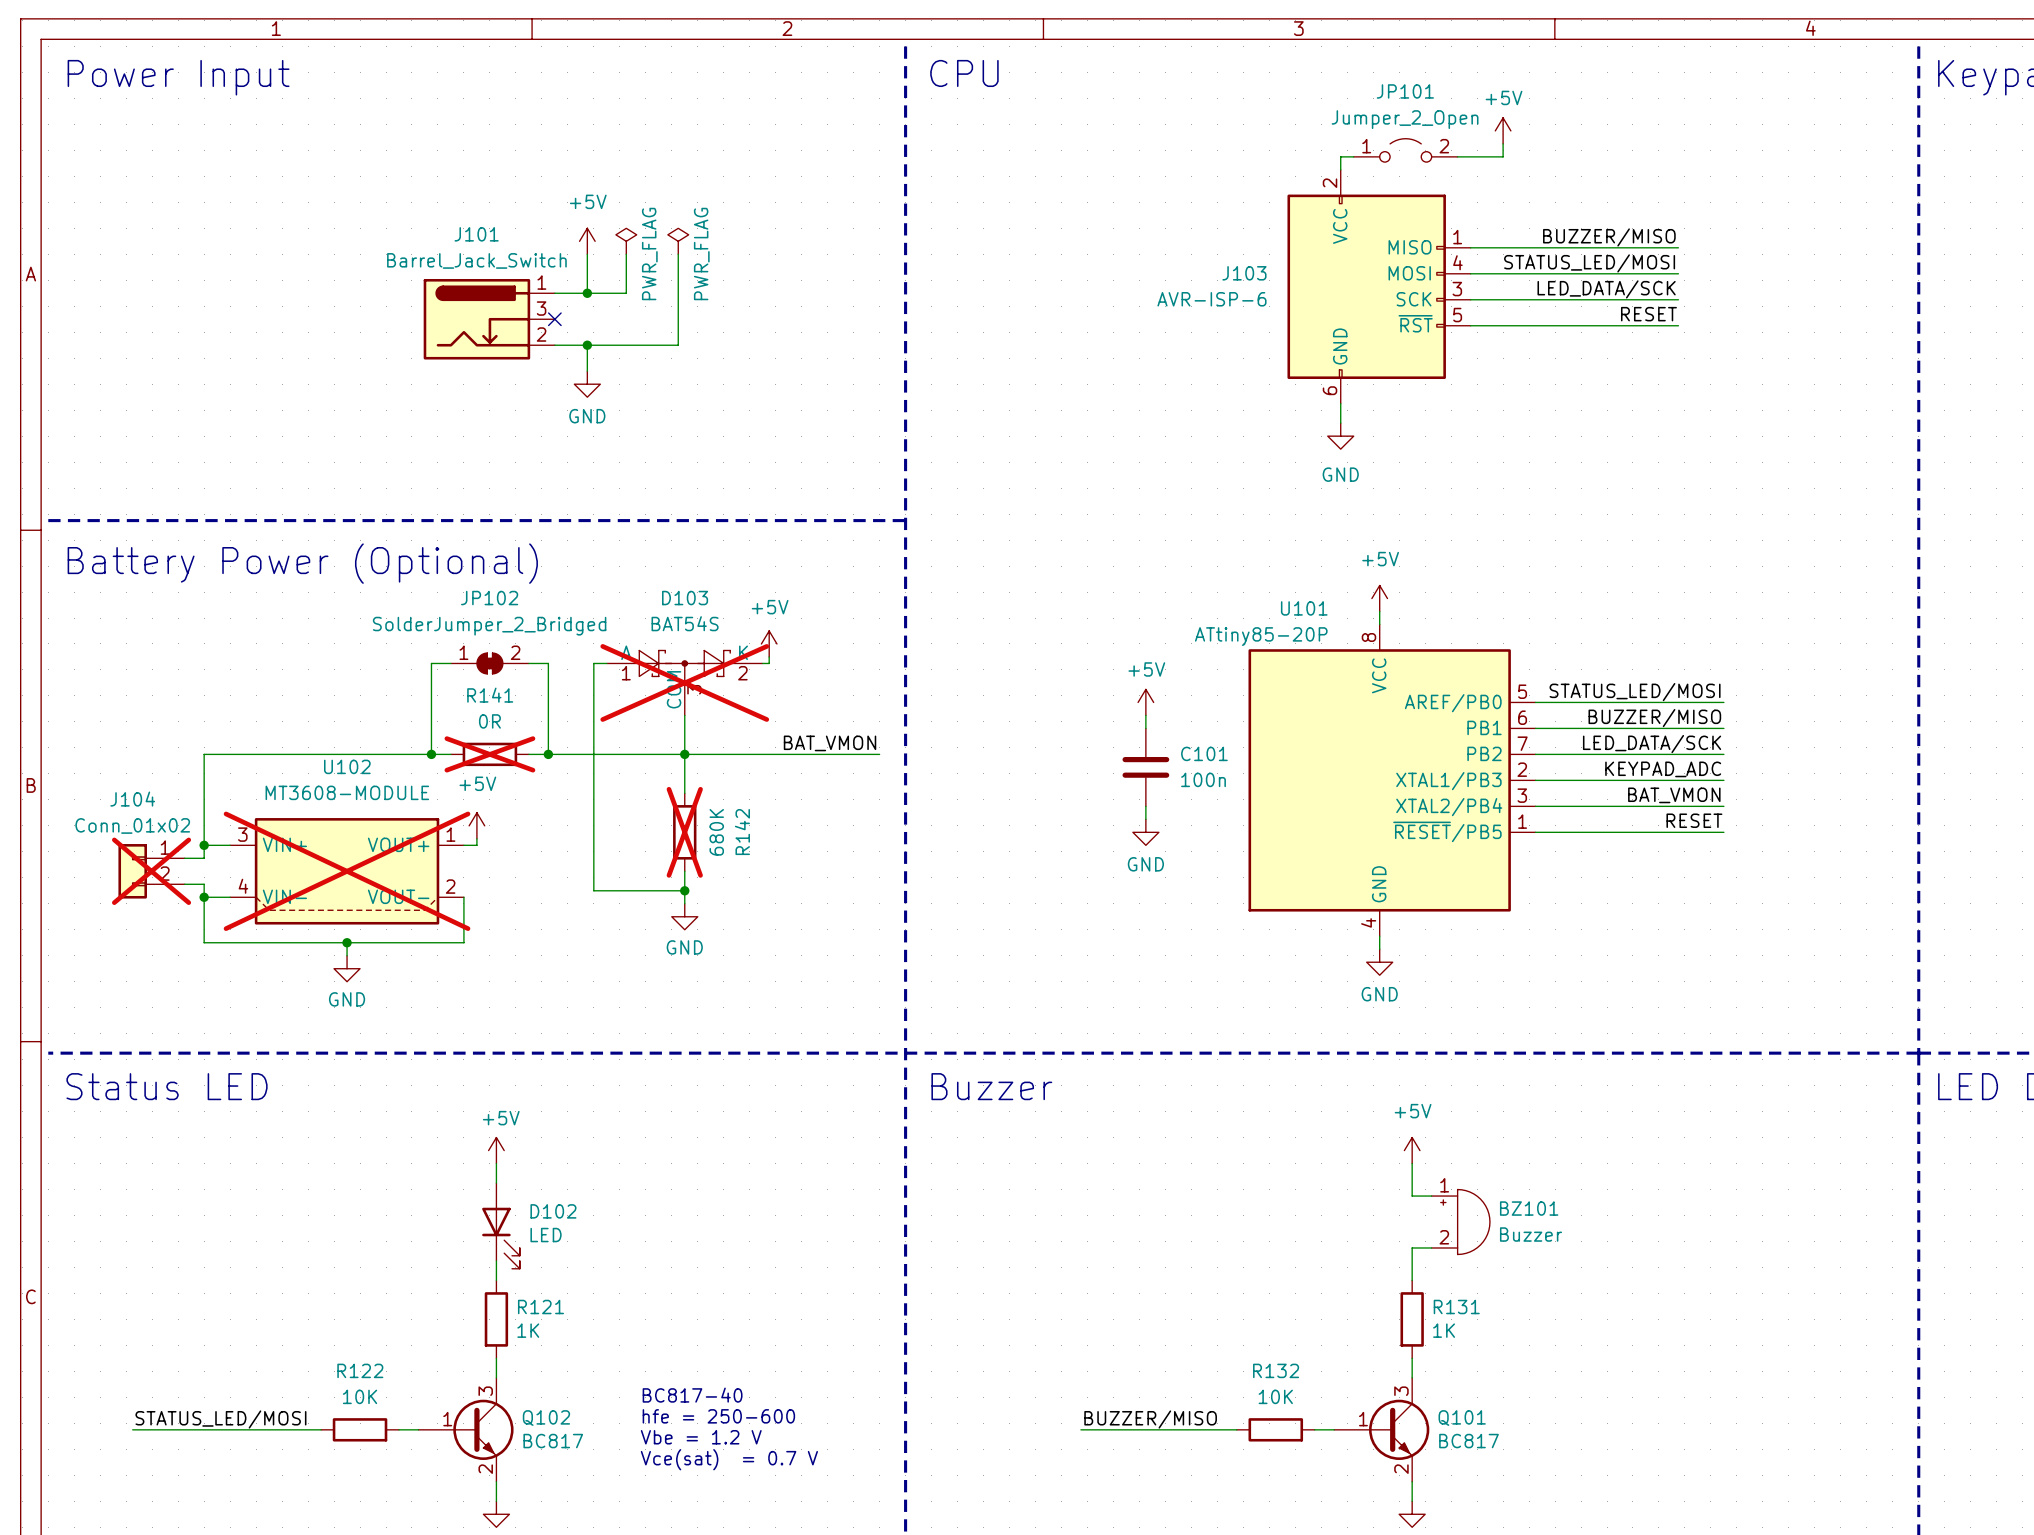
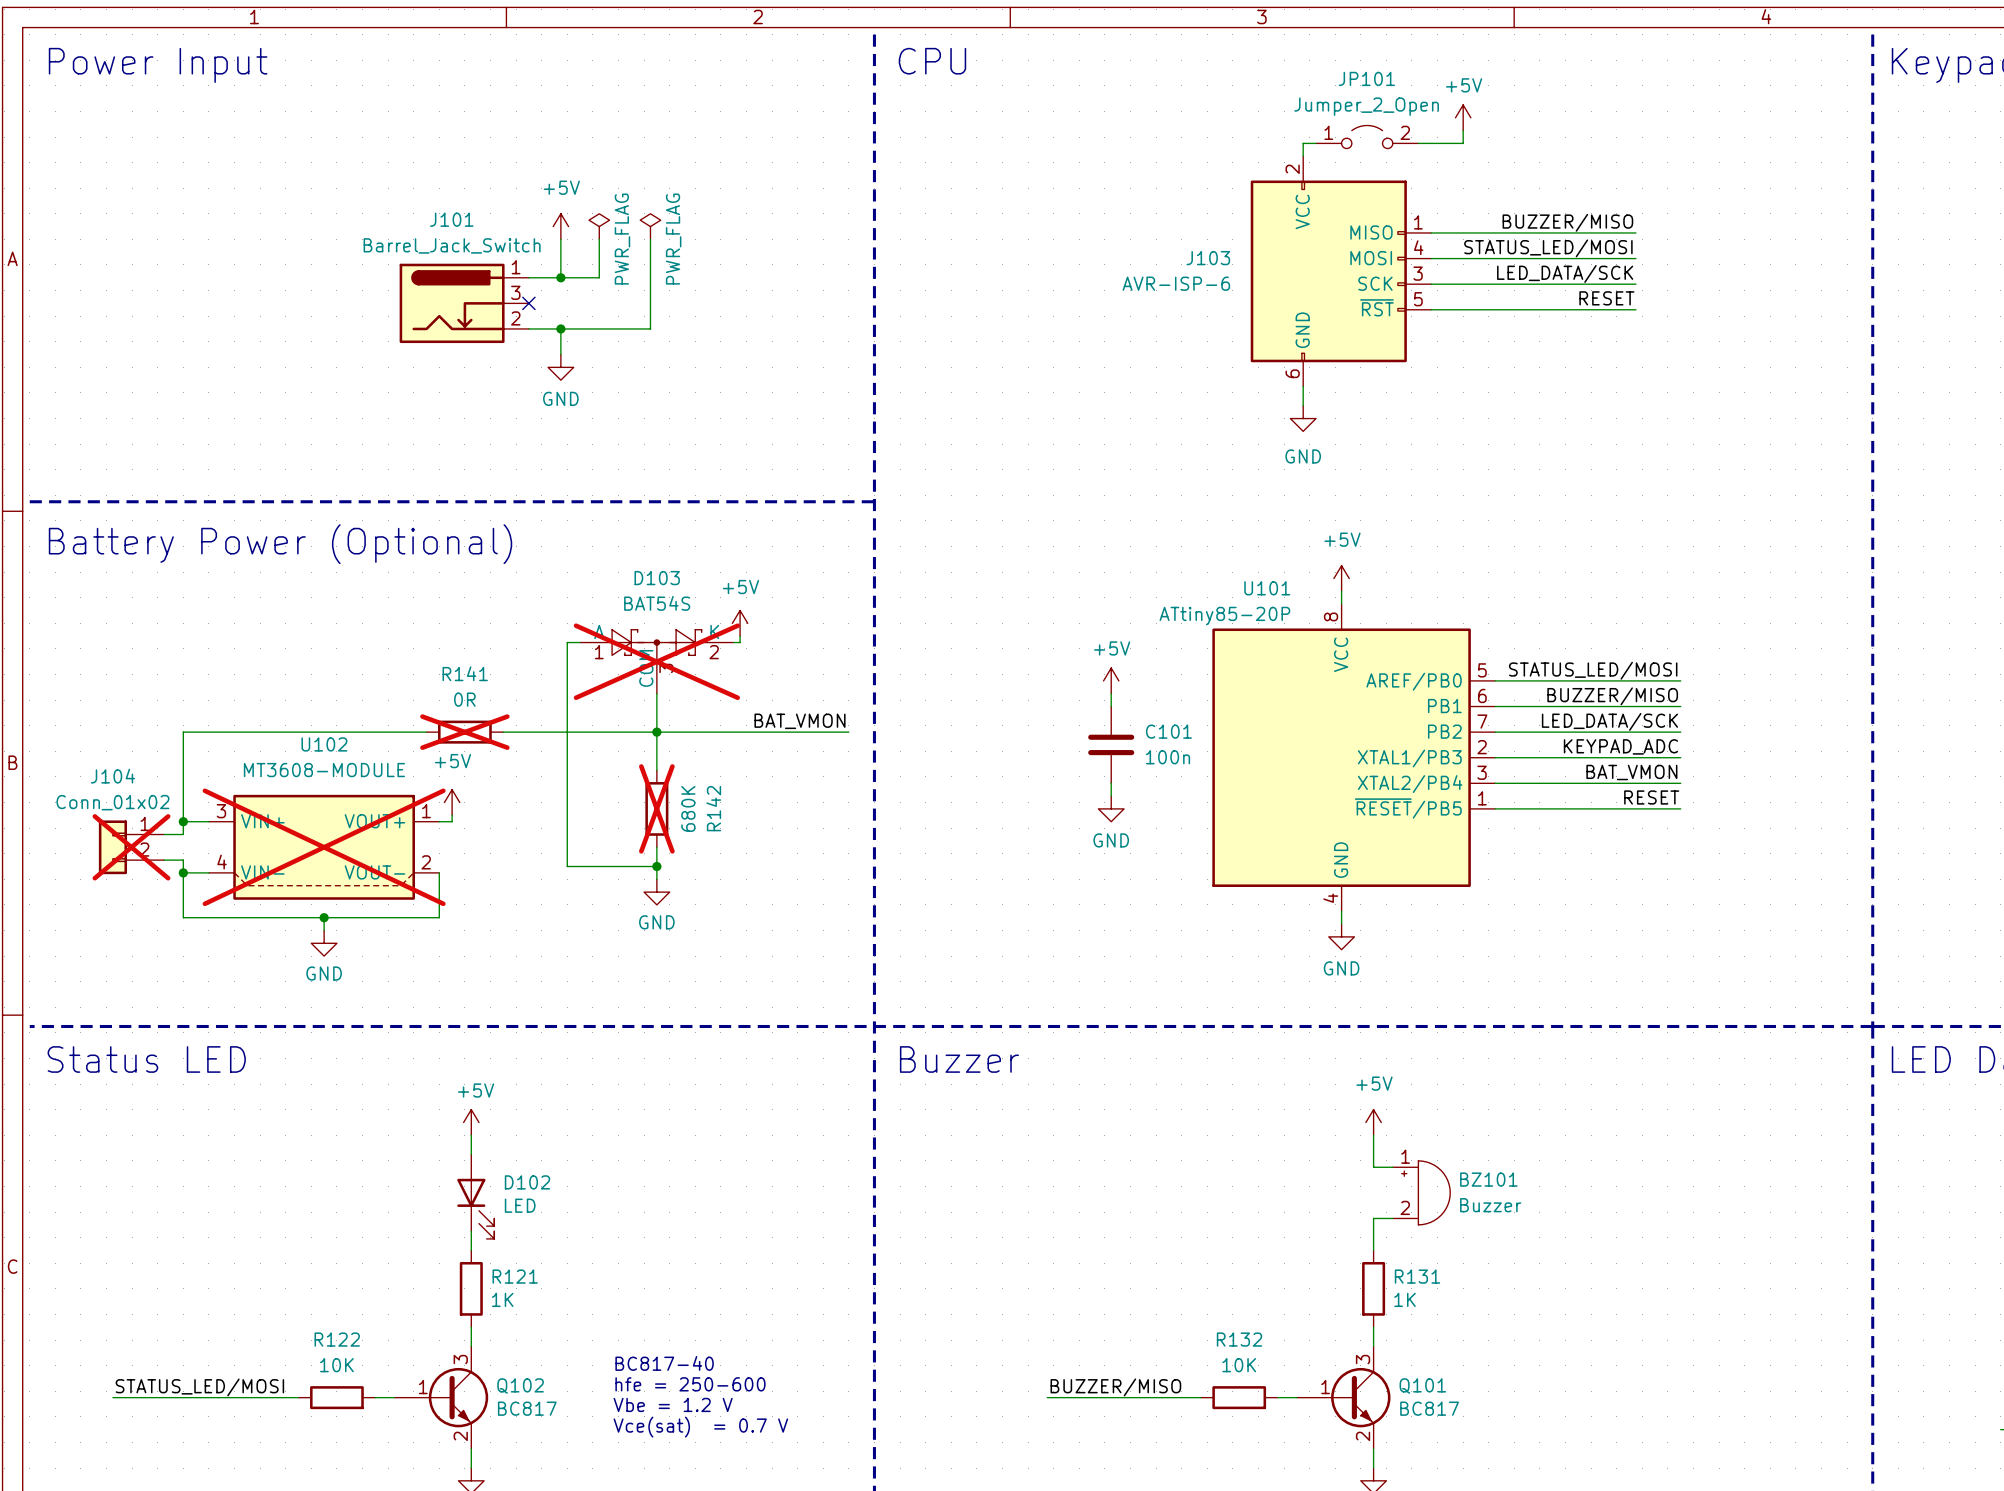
wire: (450, 663) (431, 663) (431, 754) -> none
JP102: SolderJumper_2_Bridged (489, 663) -> none
wire: (528, 663) (548, 663) (548, 754) -> none
junction: (431, 754) -> none
junction: (548, 754) -> none

